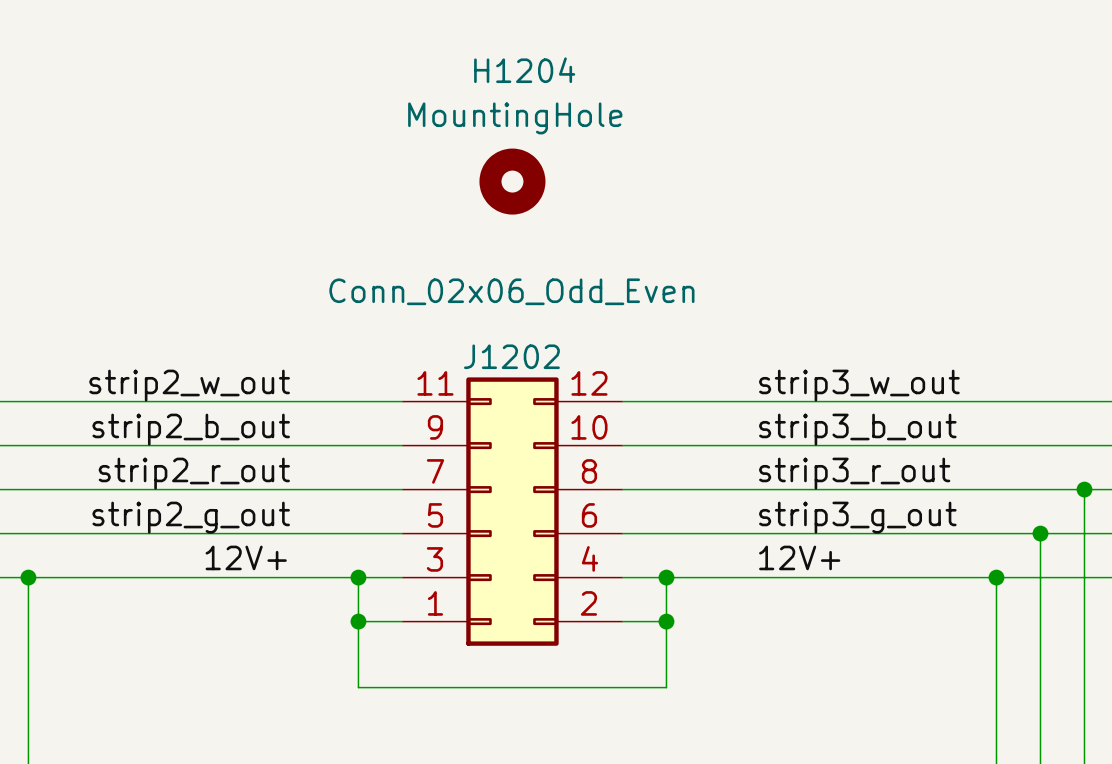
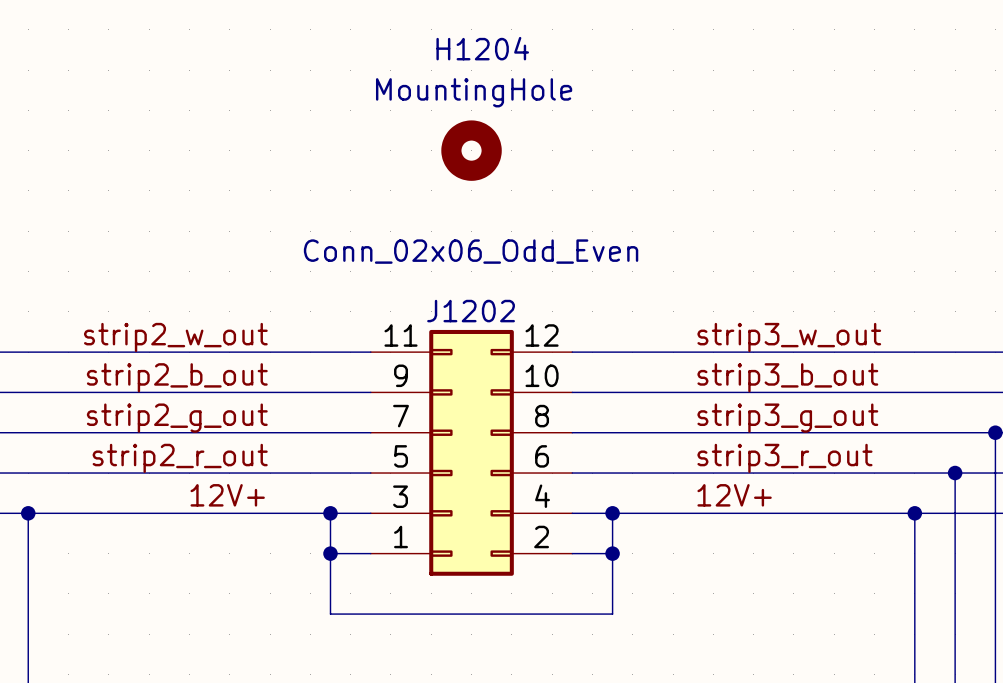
label: strip2_r_out (194, 473) -> strip2_g_out (177, 418)
label: strip3_r_out (854, 473) -> strip3_g_out (787, 418)
label: strip2_g_out (191, 517) -> strip2_r_out (180, 458)
label: strip3_g_out (857, 517) -> strip3_r_out (784, 458)

